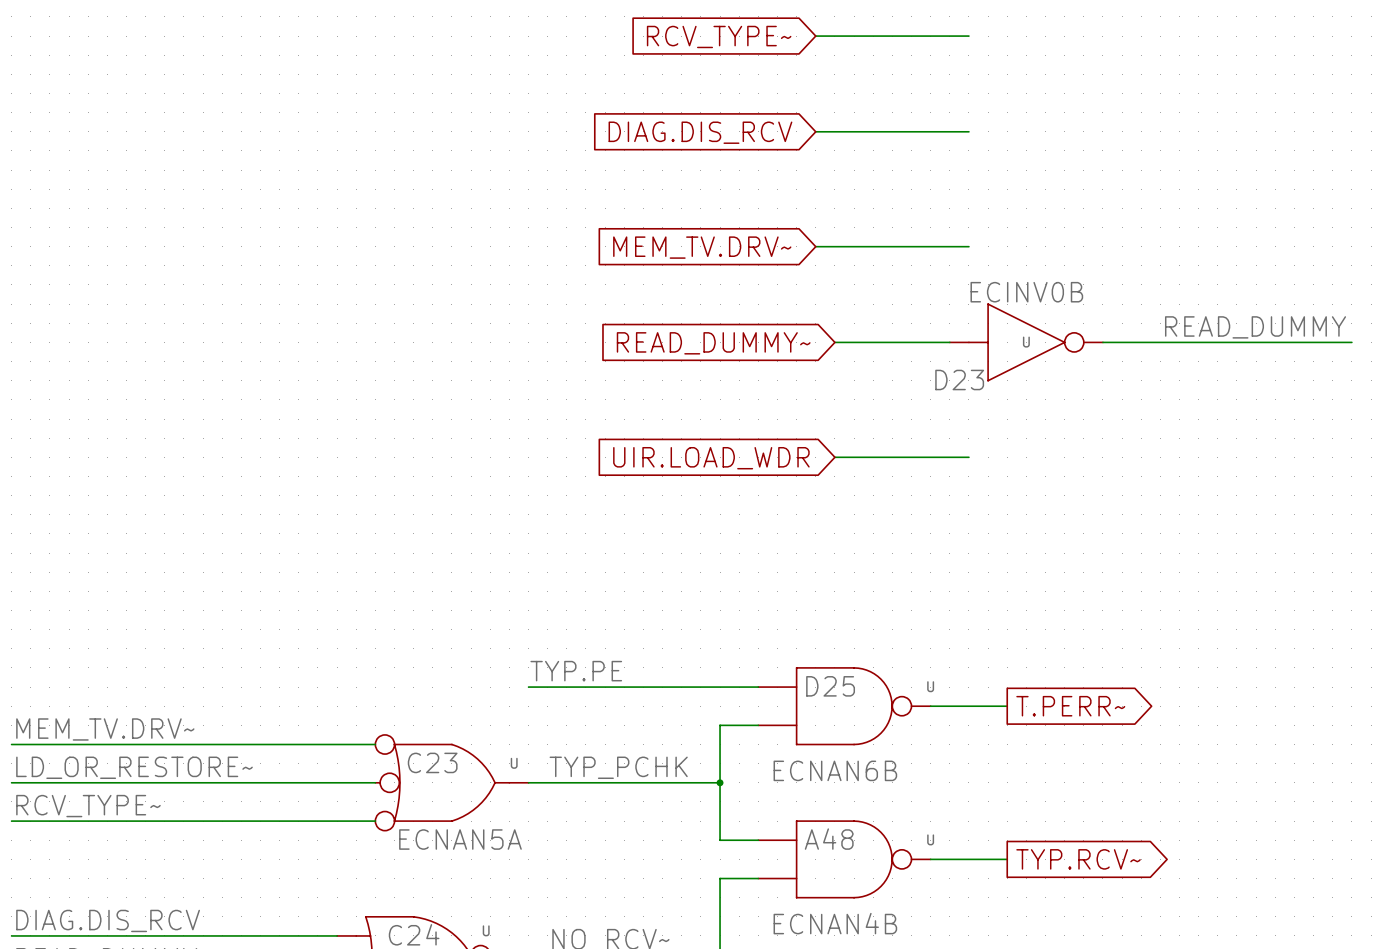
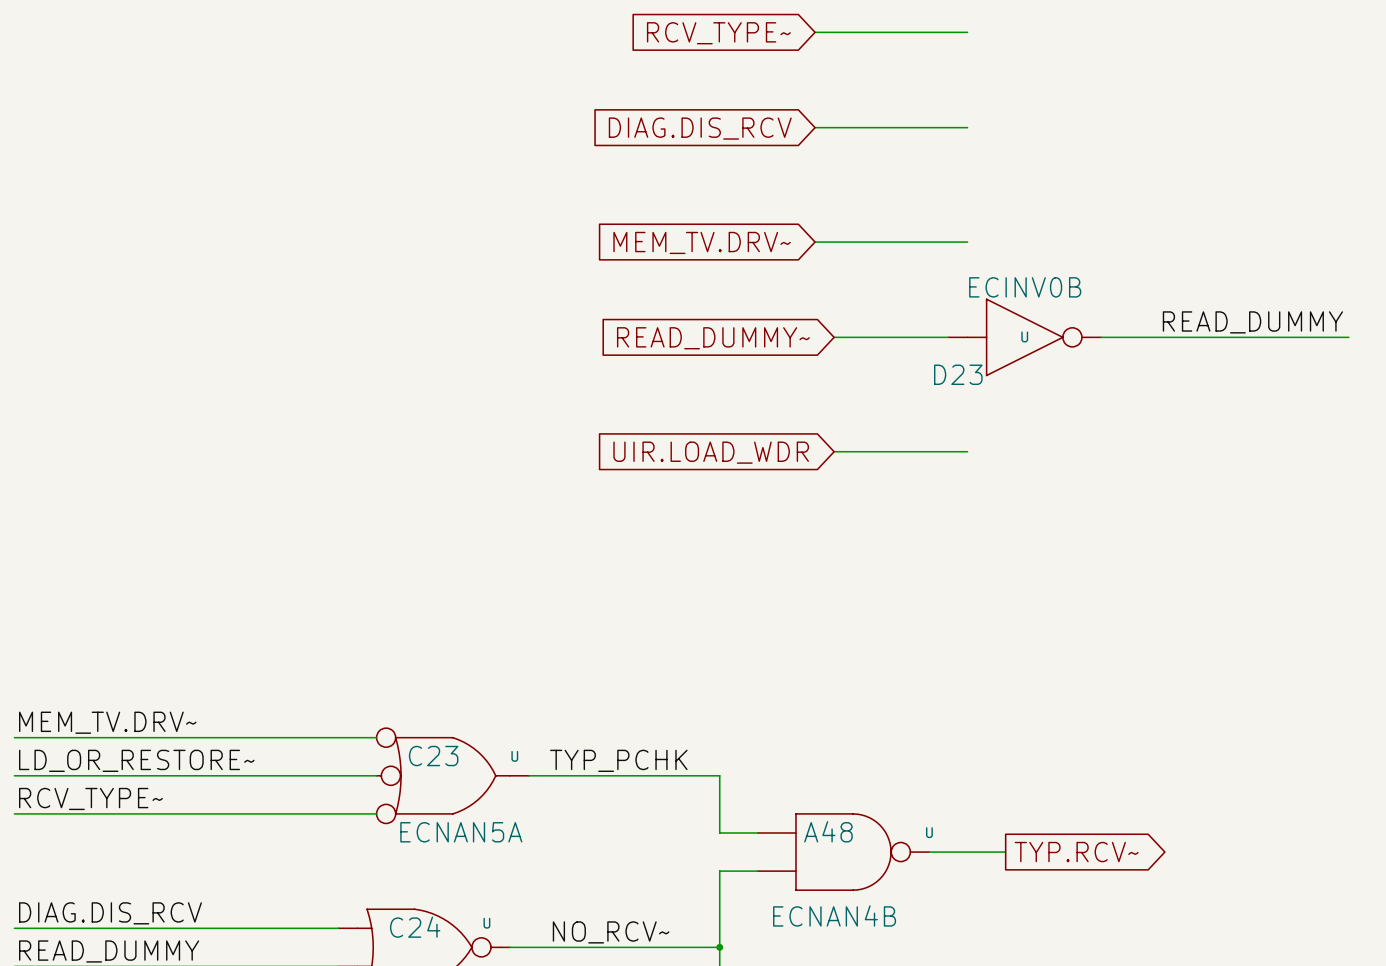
label: TYP.PE (576, 671) -> none
wire: (528, 687) (758, 687) -> none
U: (844, 706) -> none
wire: (930, 706) (1007, 706) -> none
global label: T.PERR~ (1070, 706) -> none
wire: (758, 725) (720, 725) (720, 782) -> none
junction: (720, 782) -> none

